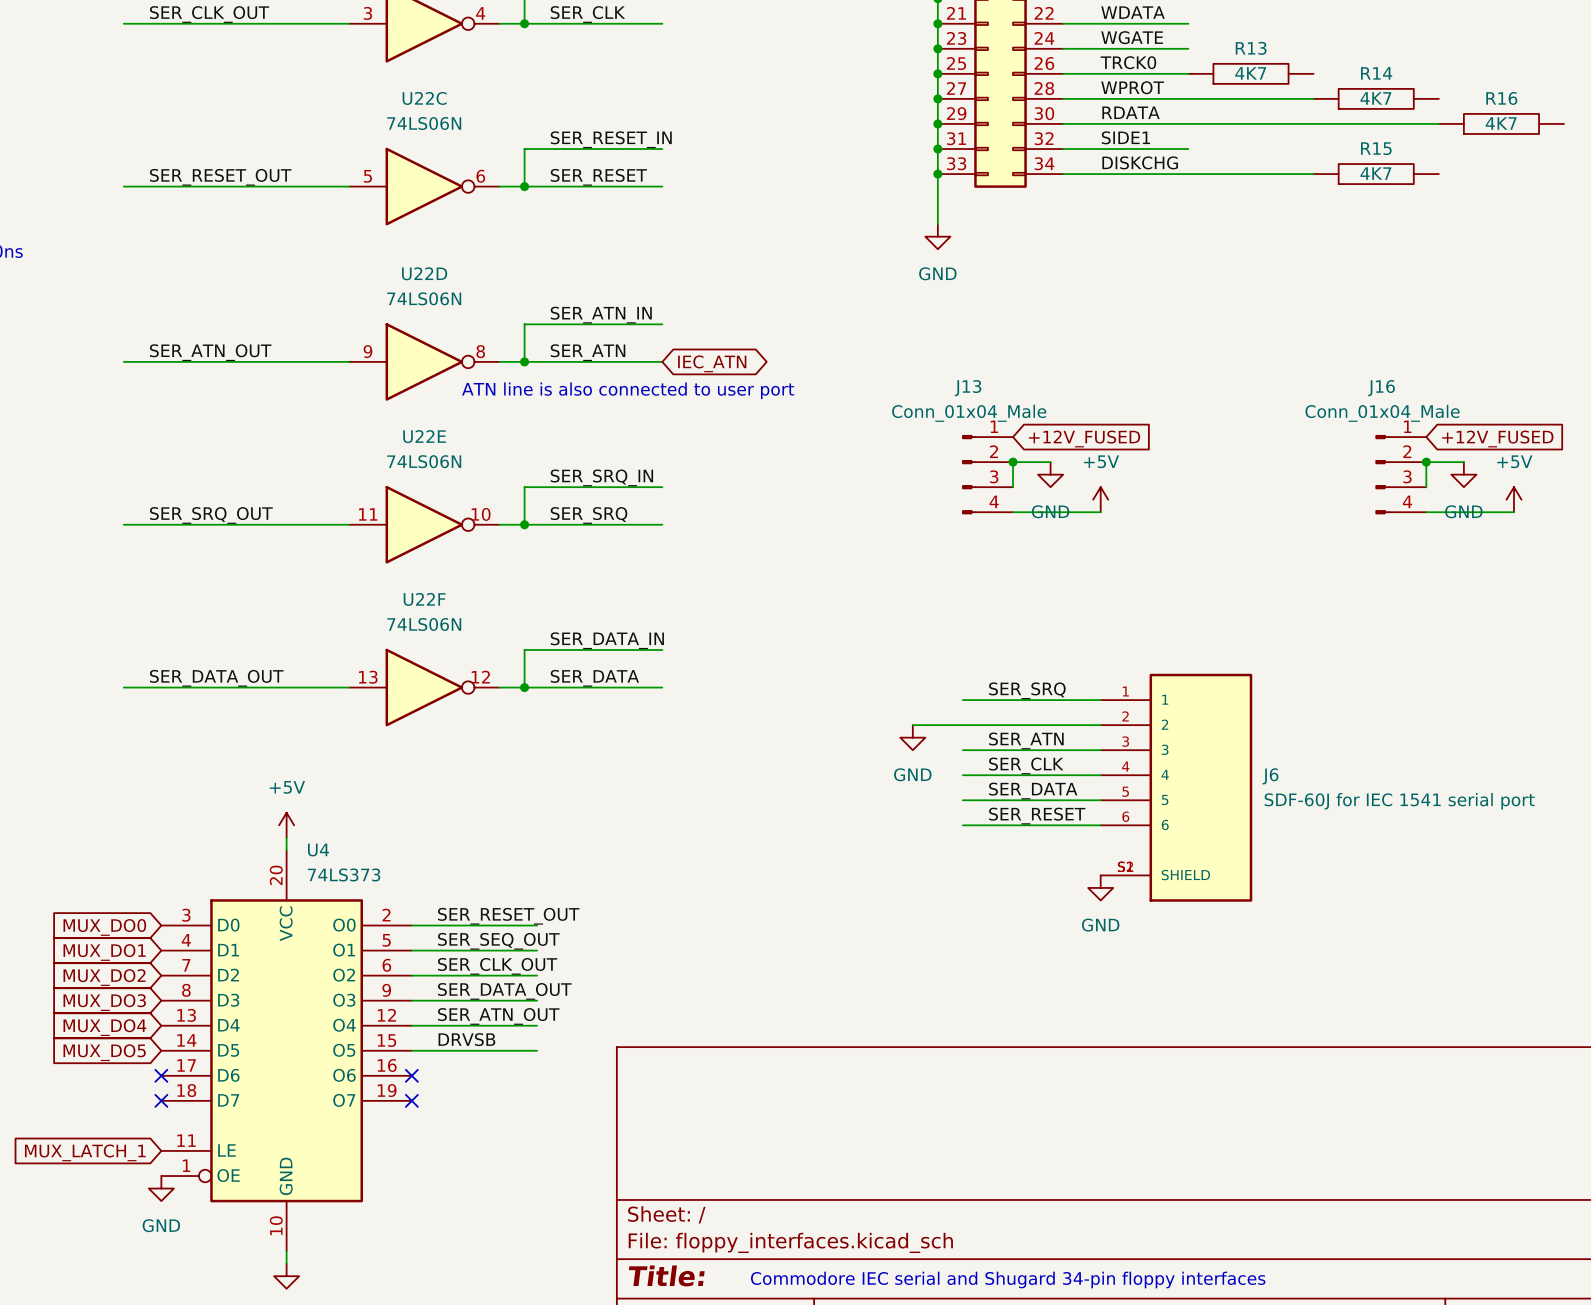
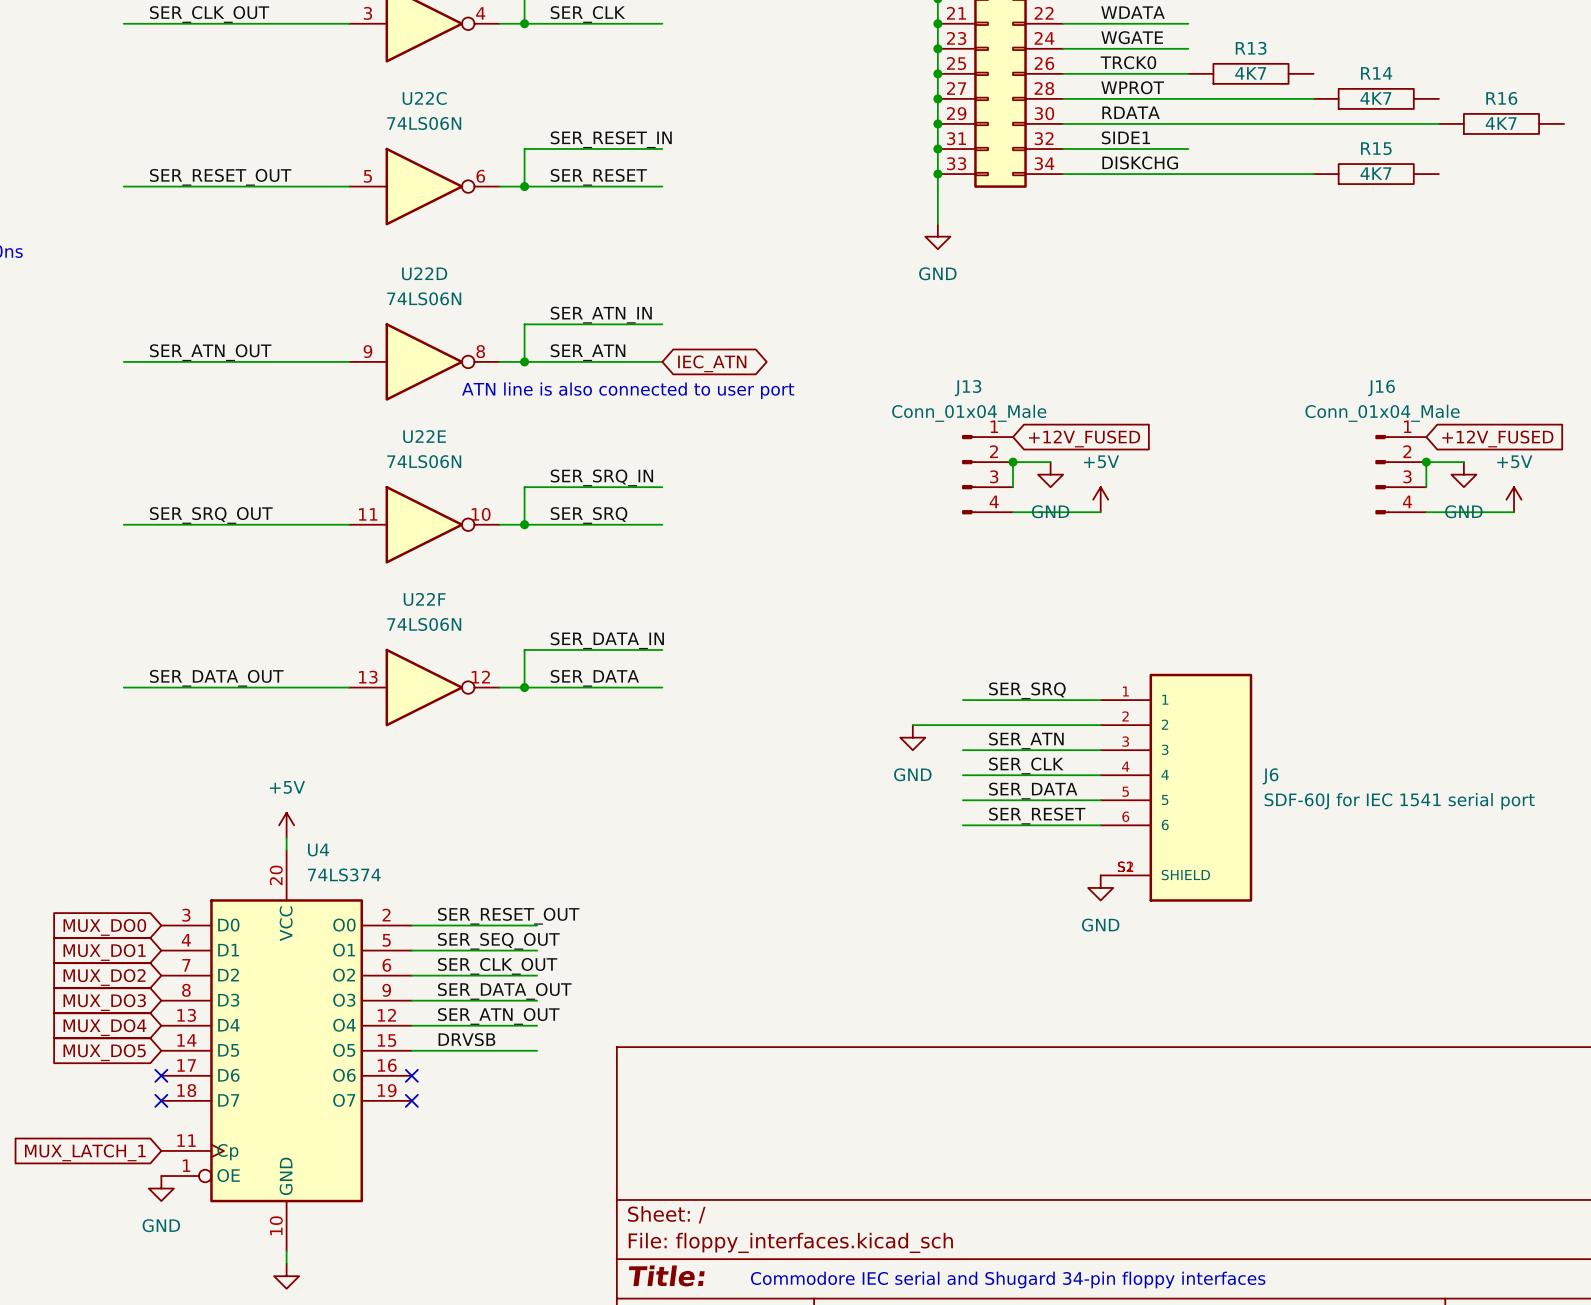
U4 symbol: [161, 850, 412, 1252] -> [161, 850, 412, 1252]
U4 value: 74LS373 (344, 874) -> 74LS374 (344, 874)

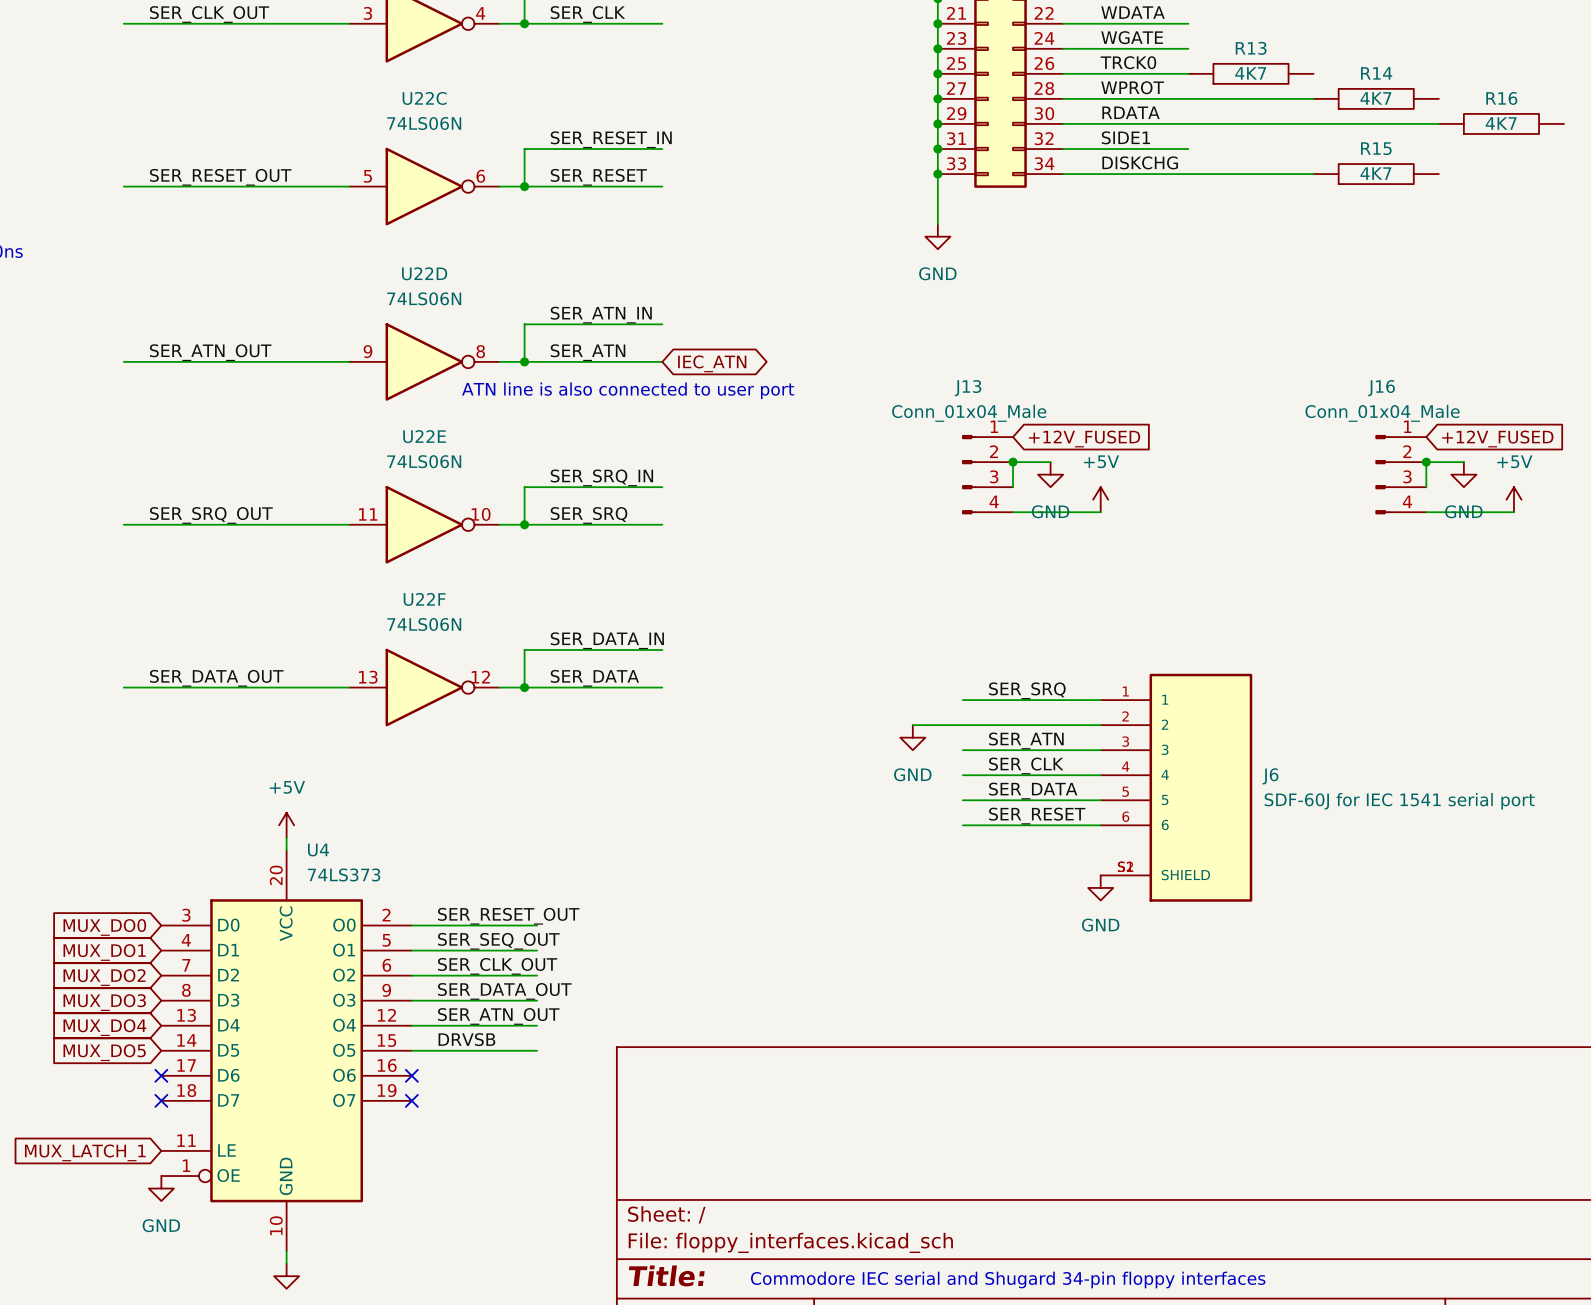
U4 symbol: [161, 850, 412, 1252] -> [161, 850, 412, 1252]
U4 value: 74LS374 (344, 874) -> 74LS373 (344, 874)

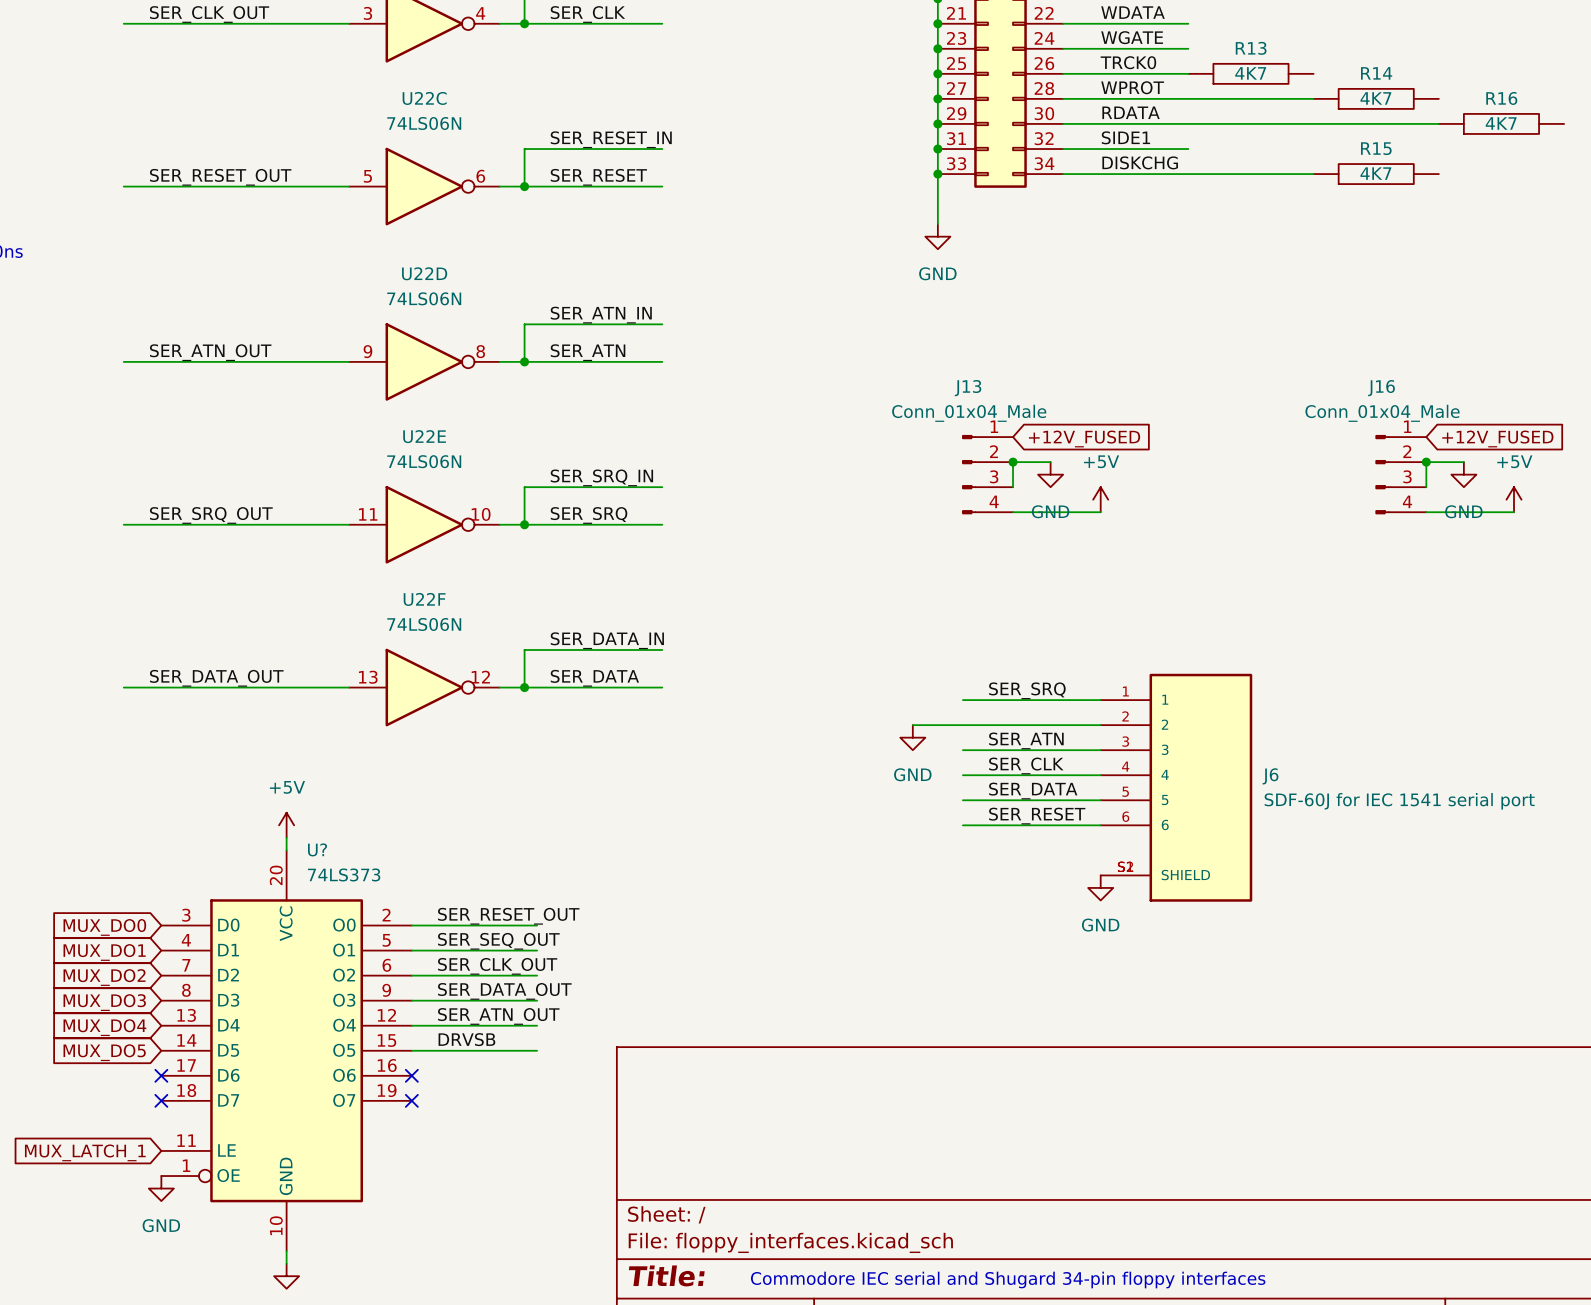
global label: IEC_ATN (712, 363) -> none
text: ATN line is also connected to user port (628, 390) -> none
U4 name: U4 (318, 850) -> U? (317, 849)

